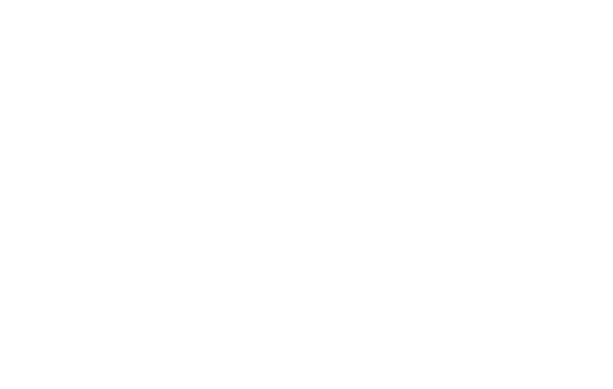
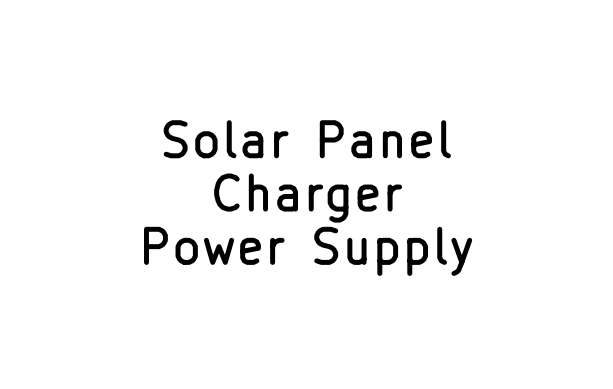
text: none -> Solar Panel (307, 139)
text: none -> Charger (308, 198)
text: none -> Power Supply (308, 251)

